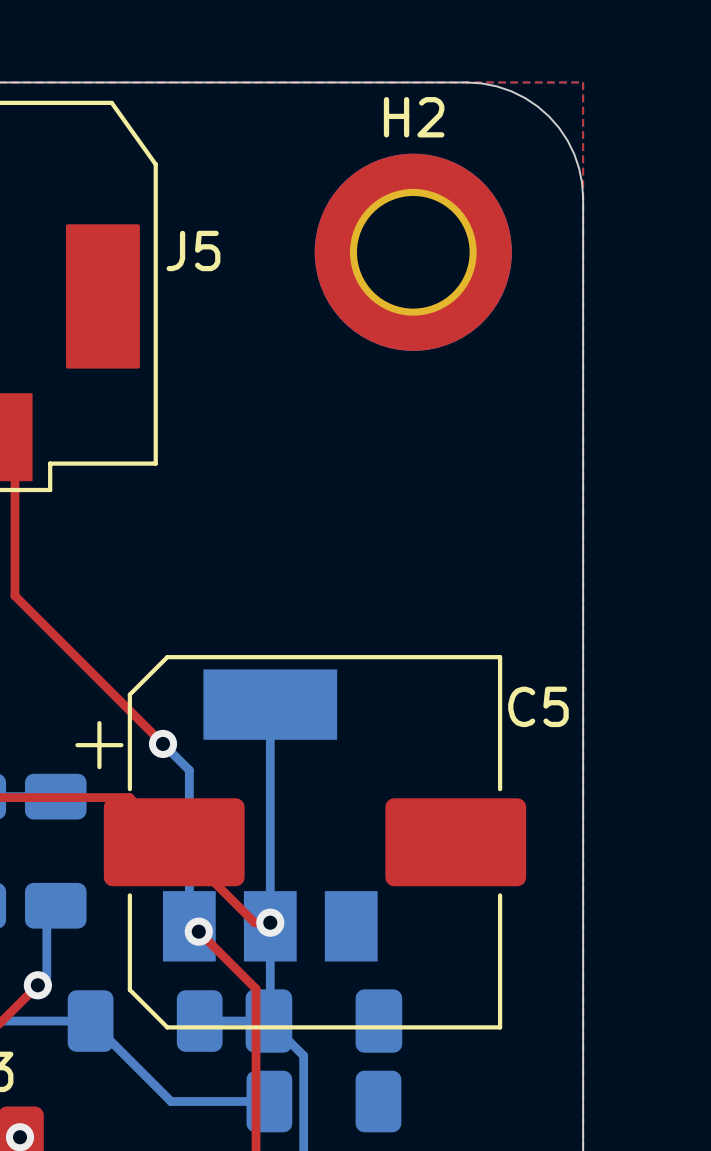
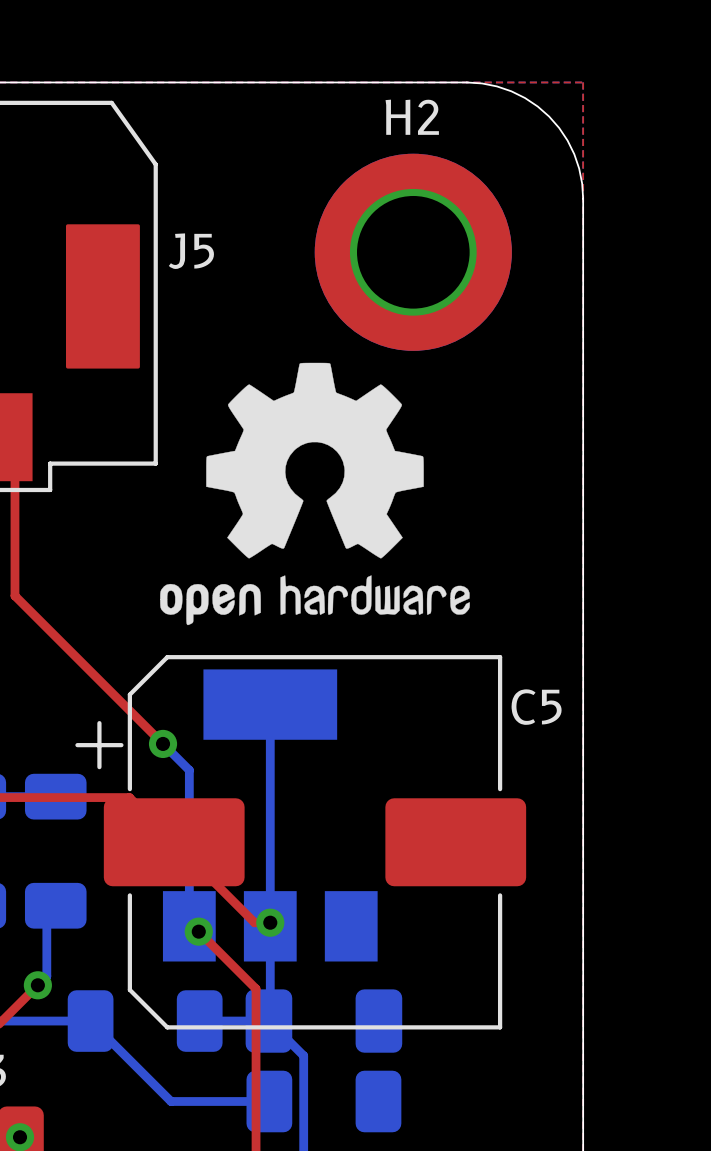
drawing: none -> [160, 362, 470, 626]

